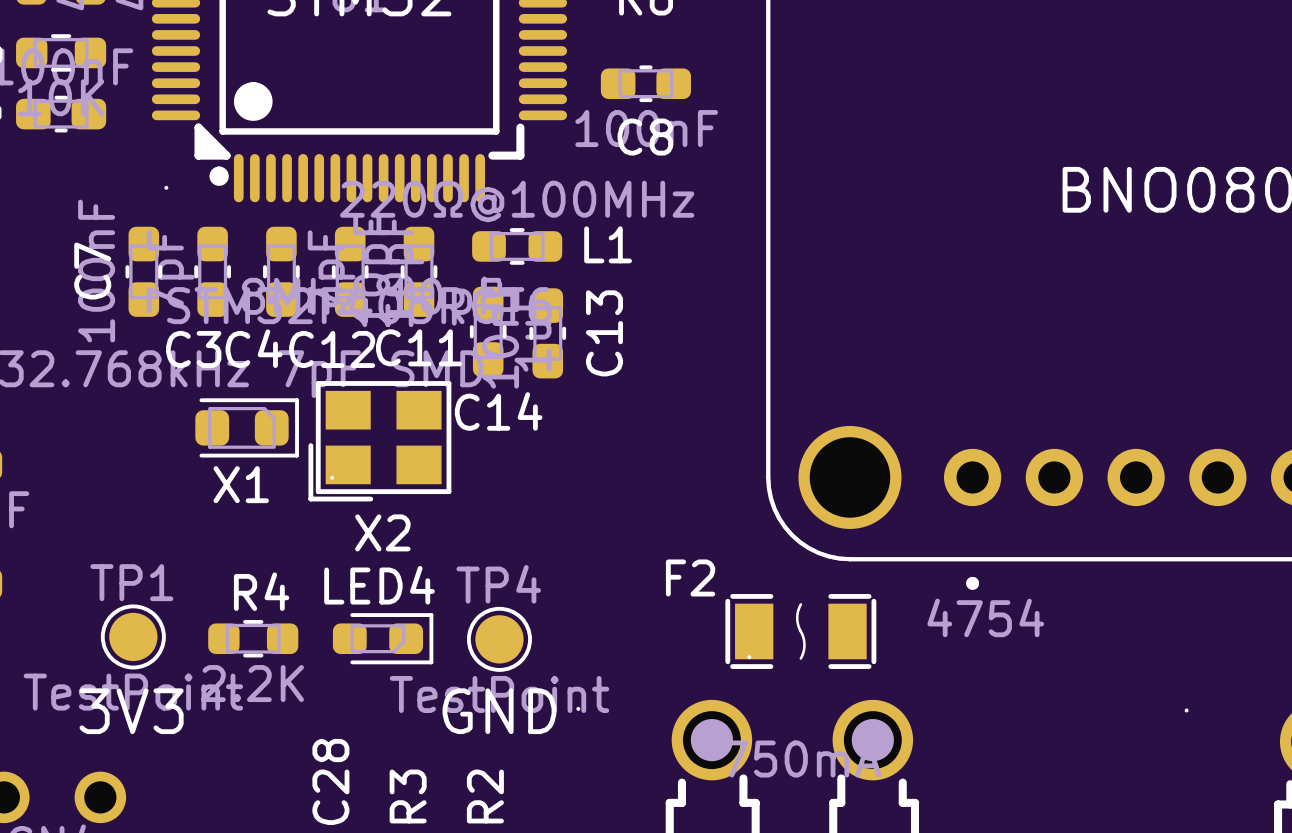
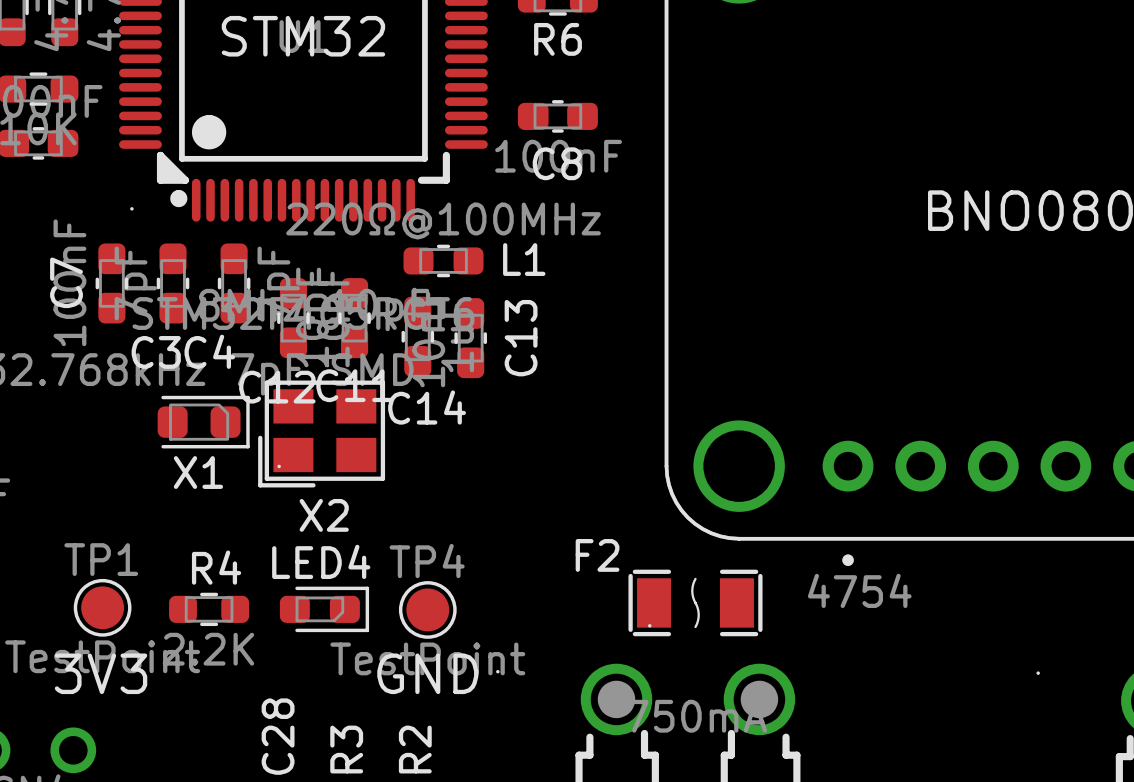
C12 position: (350, 271) -> (293, 318)
C11 position: (419, 271) -> (354, 318)

